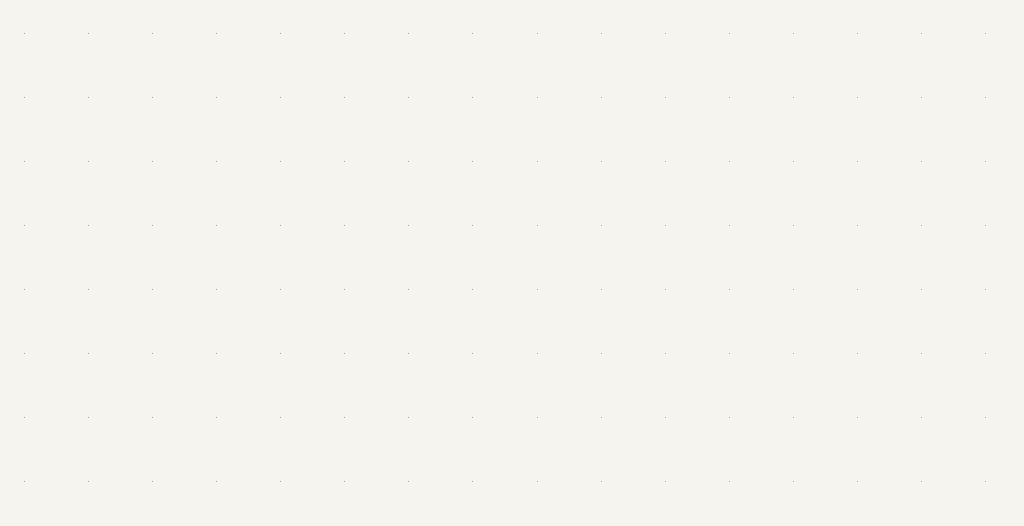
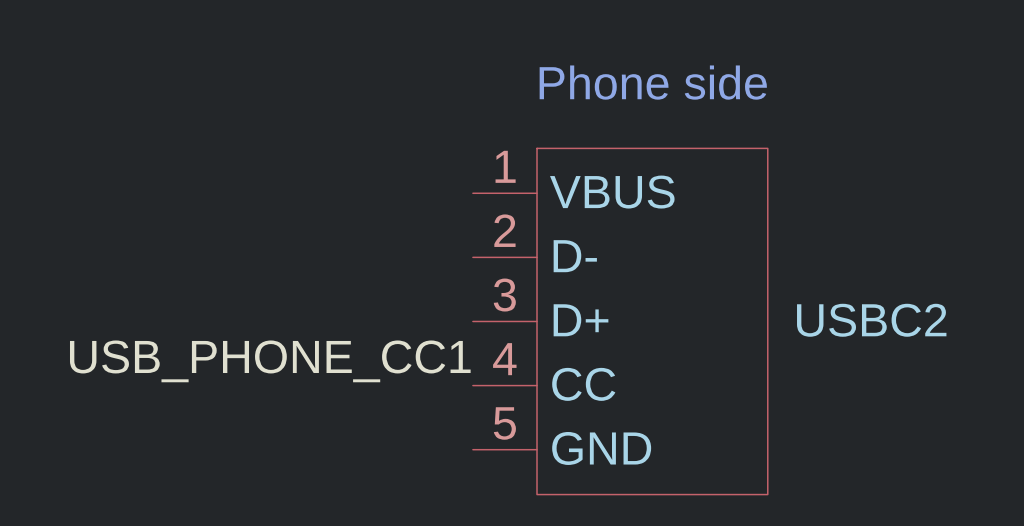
text: none -> Phone side (653, 82)
USBC2: none -> (620, 321)
label: none -> USB_PHONE_CC1 (270, 361)

